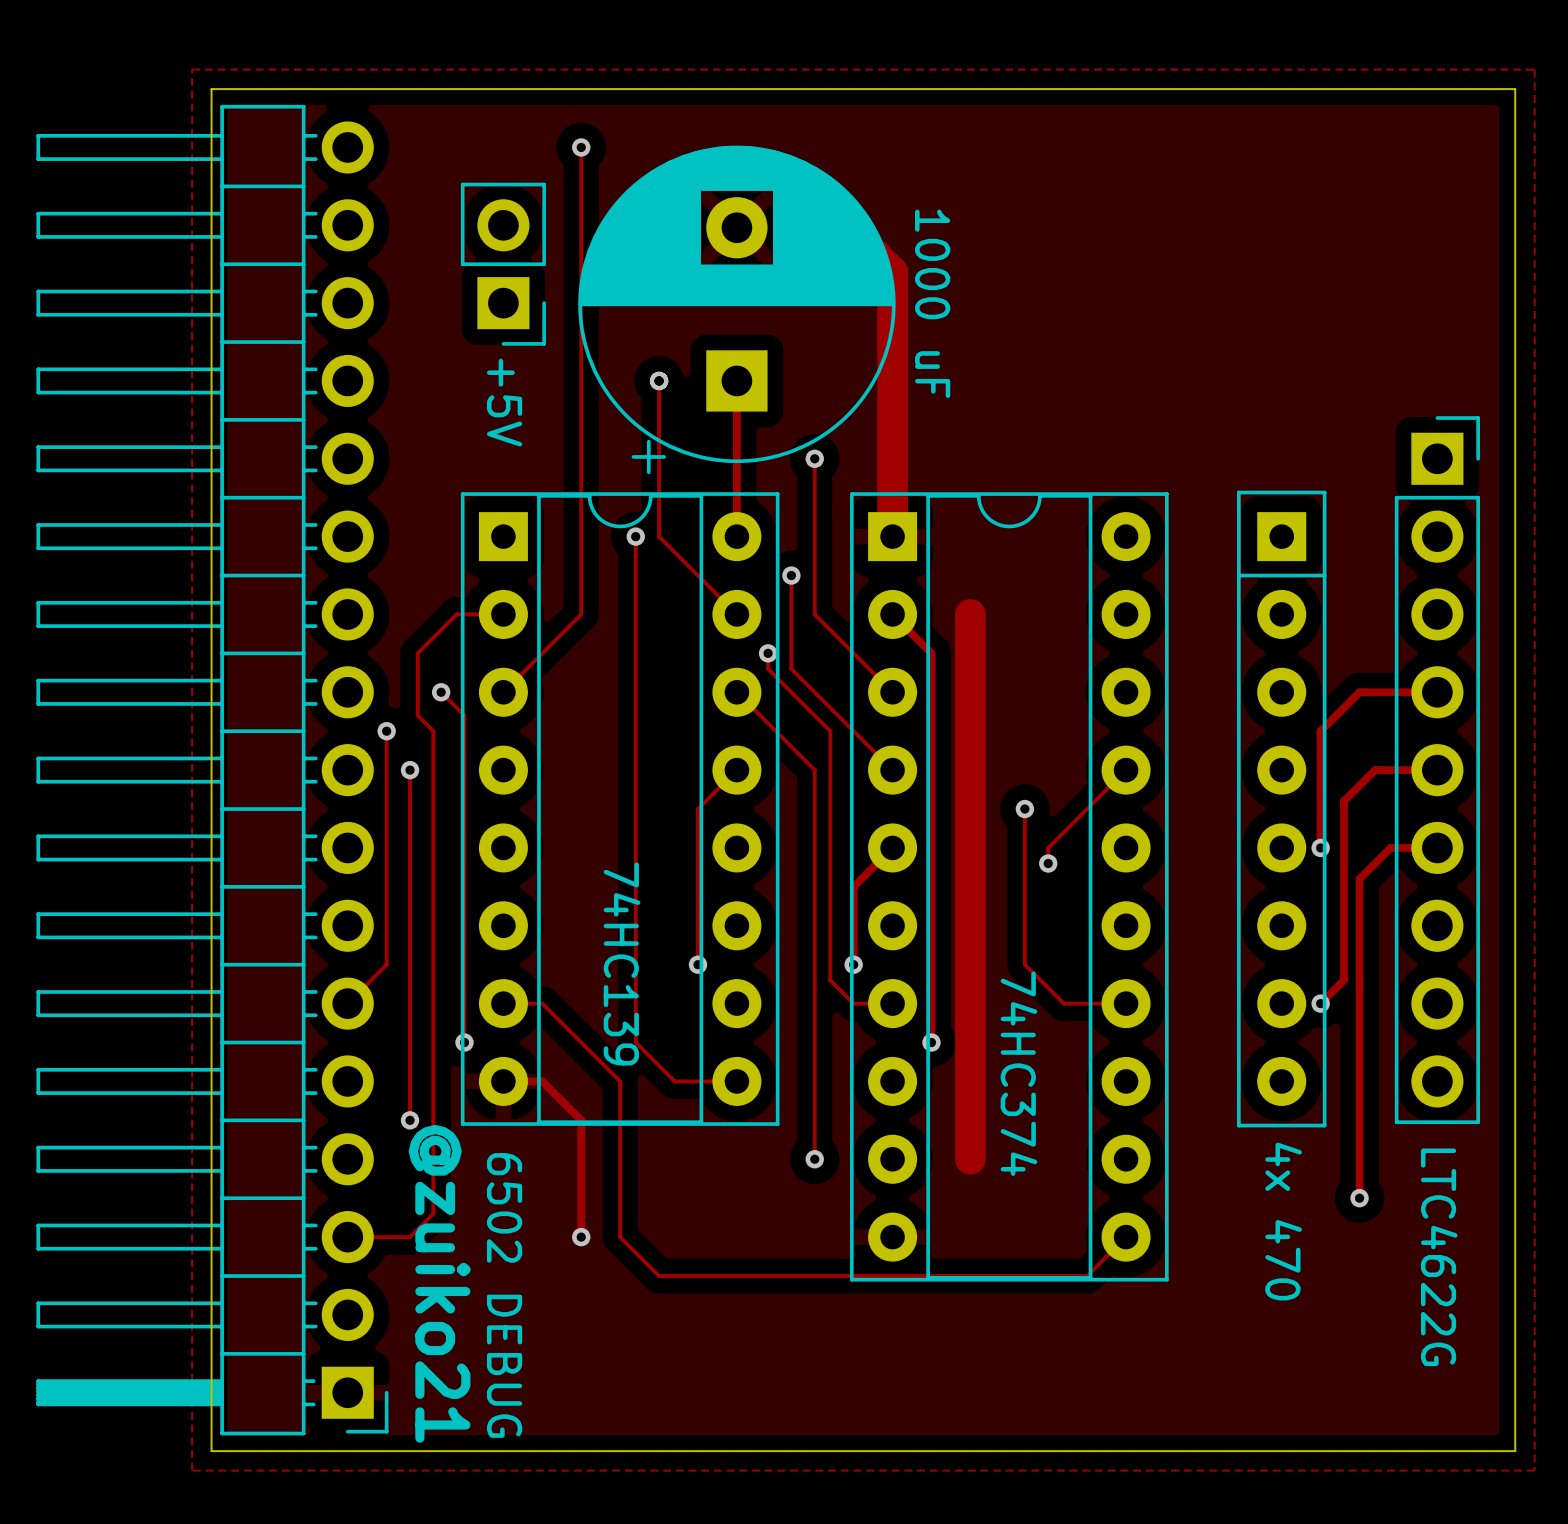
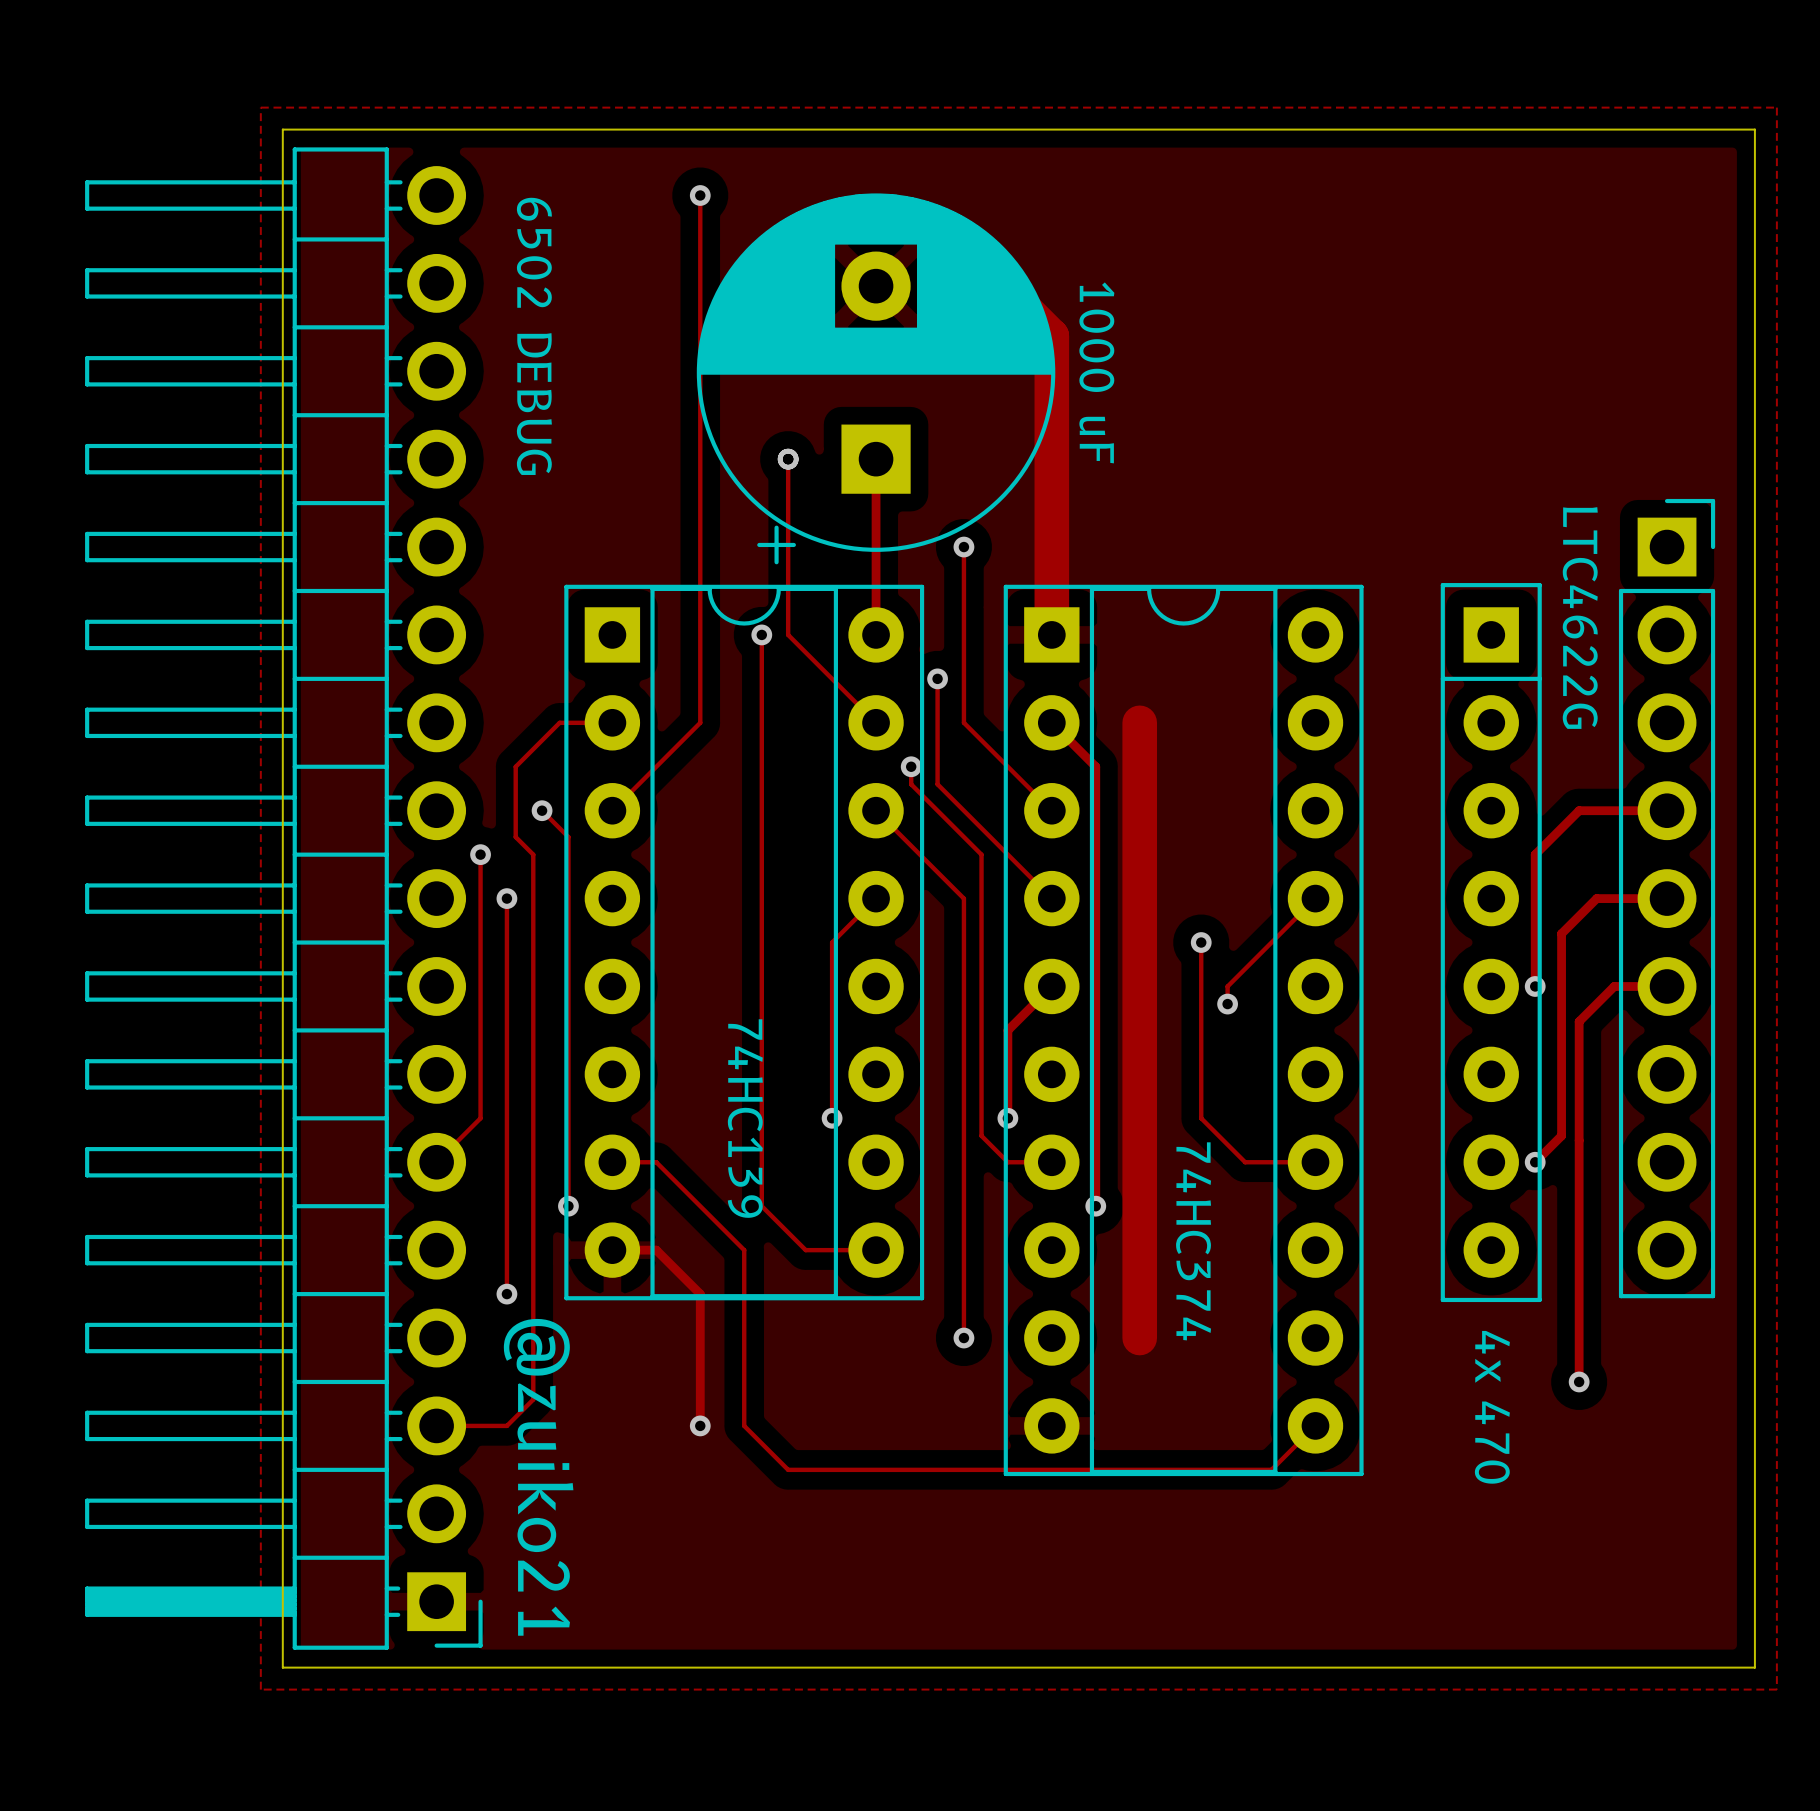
part: +5V (503, 264) -> none
part value position: LTC4622G (1439, 1257) -> LTC4622G (1580, 618)
part value position: 6502 DEBUG (504, 1295) -> 6502 DEBUG (534, 336)

